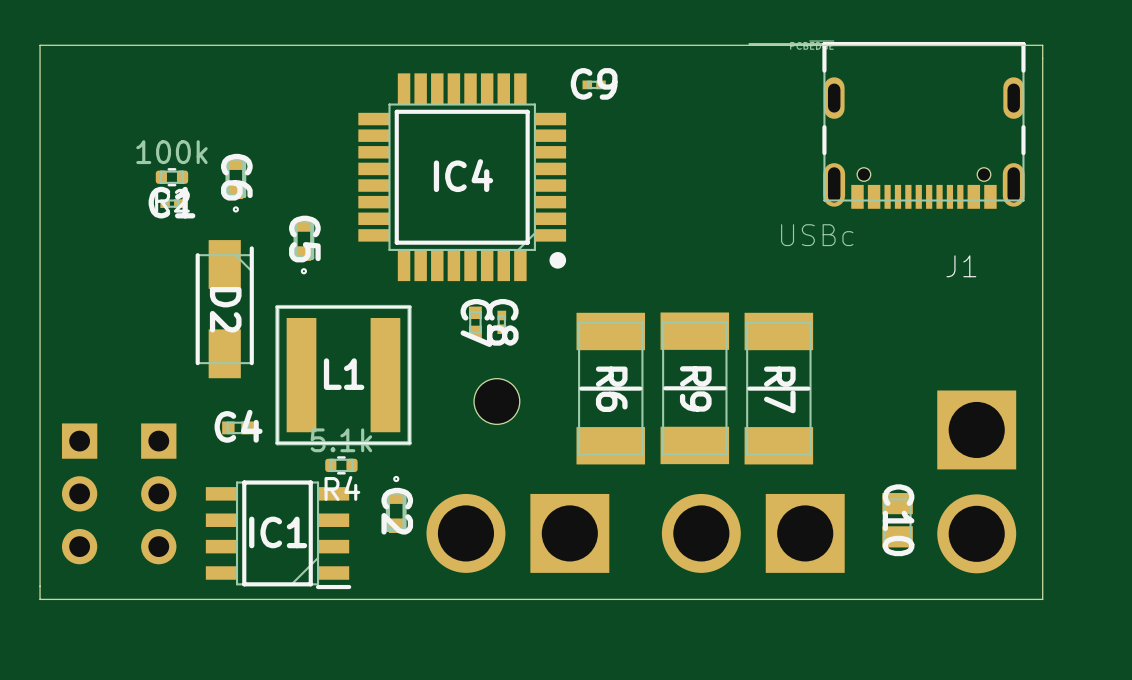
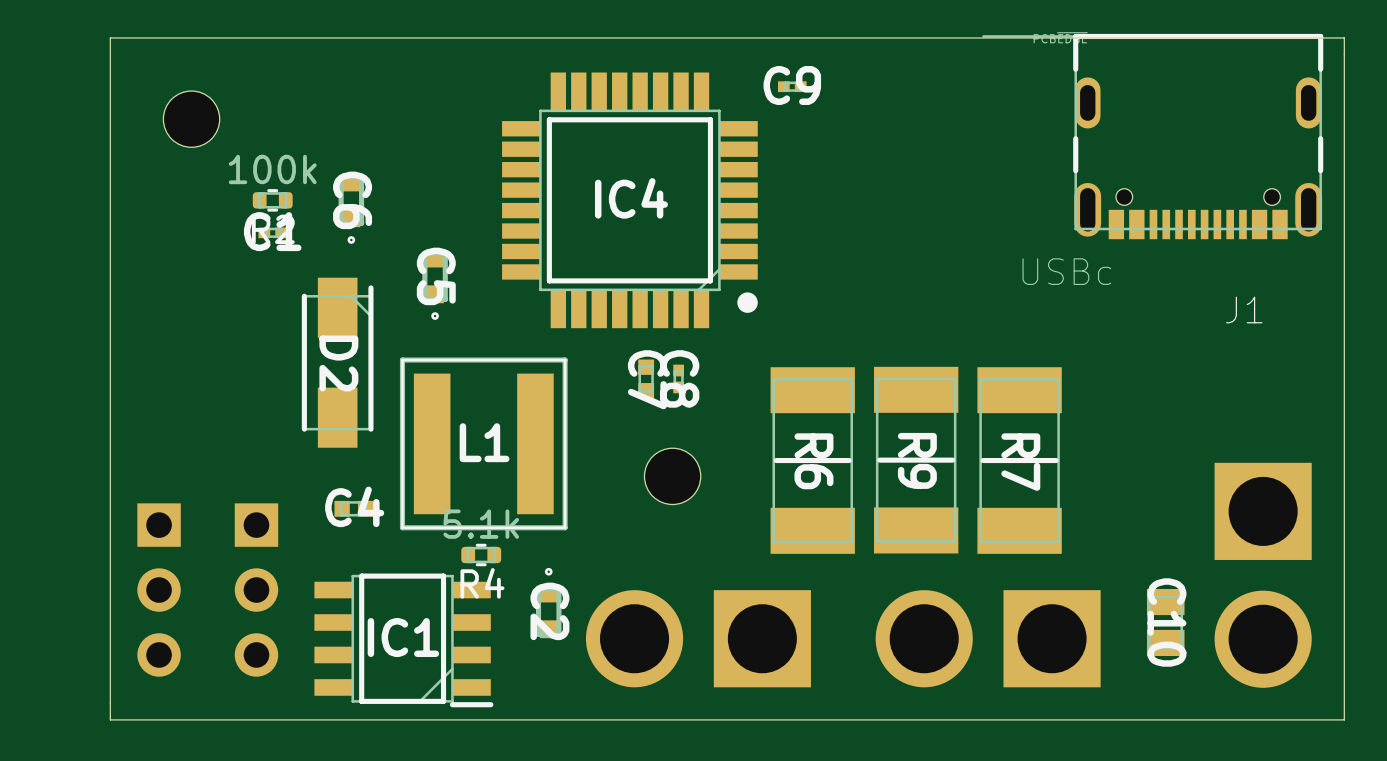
part: none -> (191, 119)

